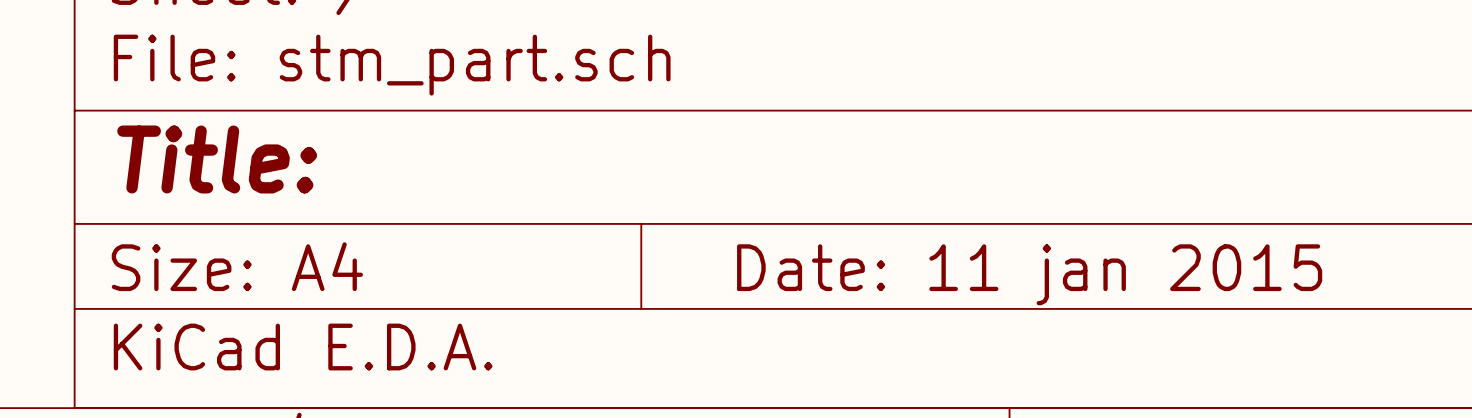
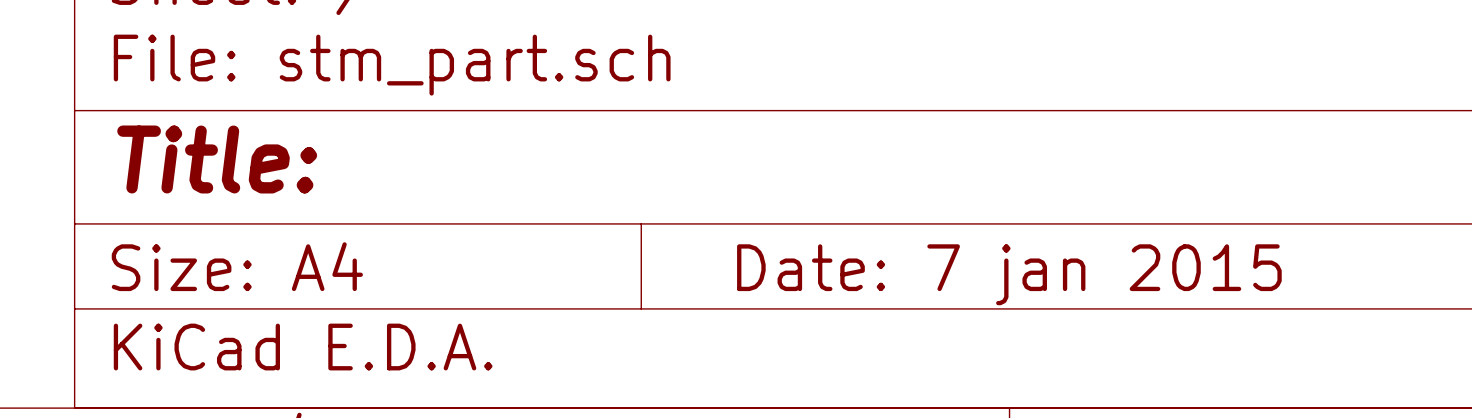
title block: Date: 11 jan 2015 (1029, 274) -> Date: 7 jan 2015 (1009, 274)

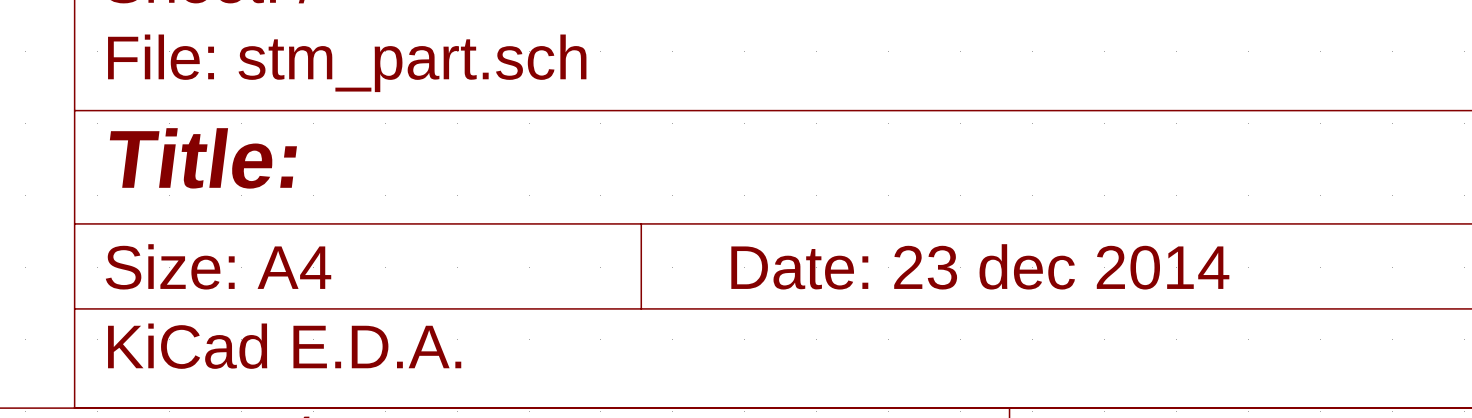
title block: Date: 7 jan 2015 (1009, 274) -> Date: 23 dec 2014 (980, 266)

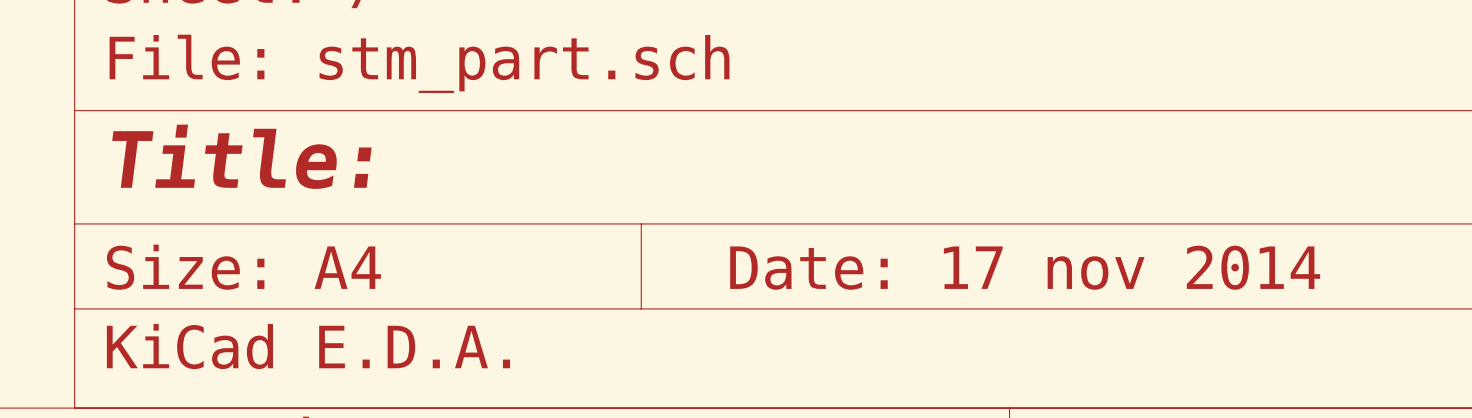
title block: Date: 23 dec 2014 (980, 266) -> Date: 17 nov 2014 (1025, 267)

